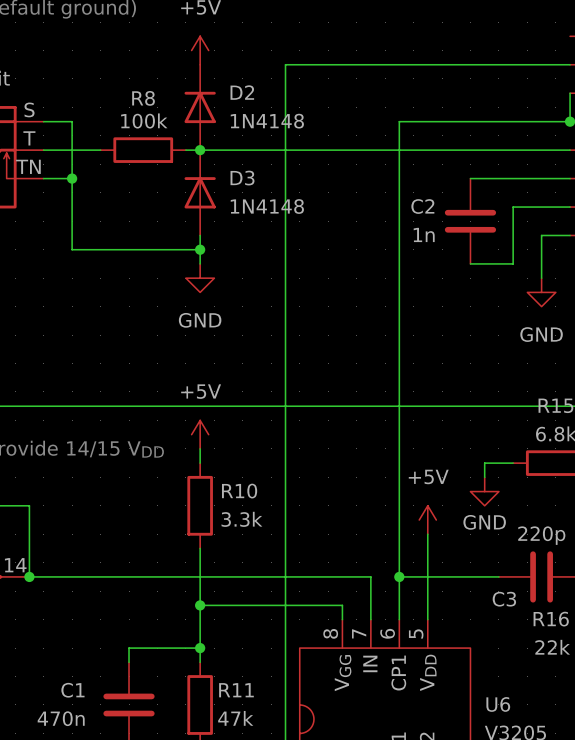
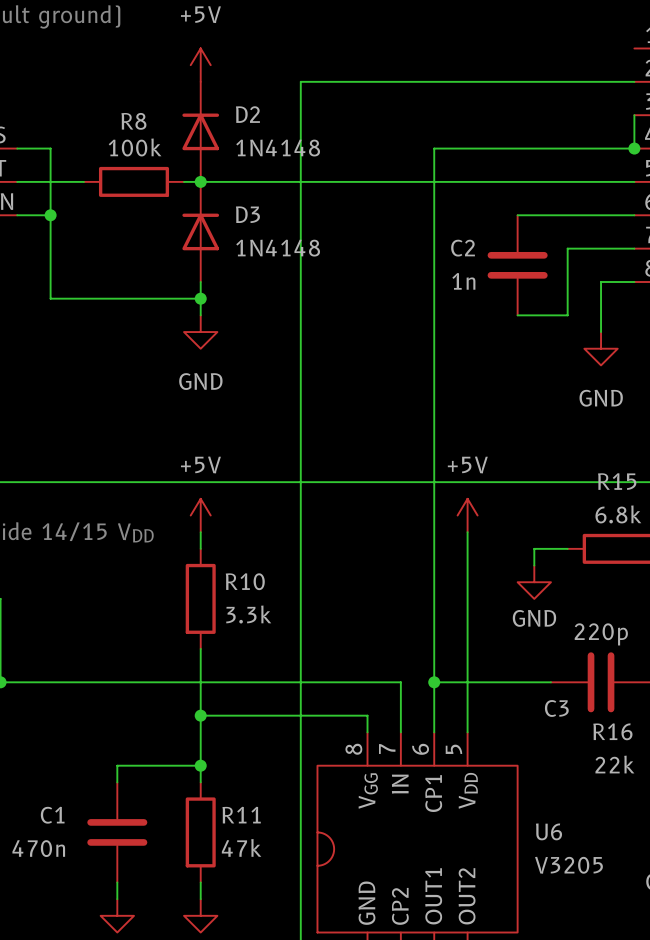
wire: none -> (467, 532) (467, 632)
power symbol position: +5V (427, 520) -> +5V (467, 515)

